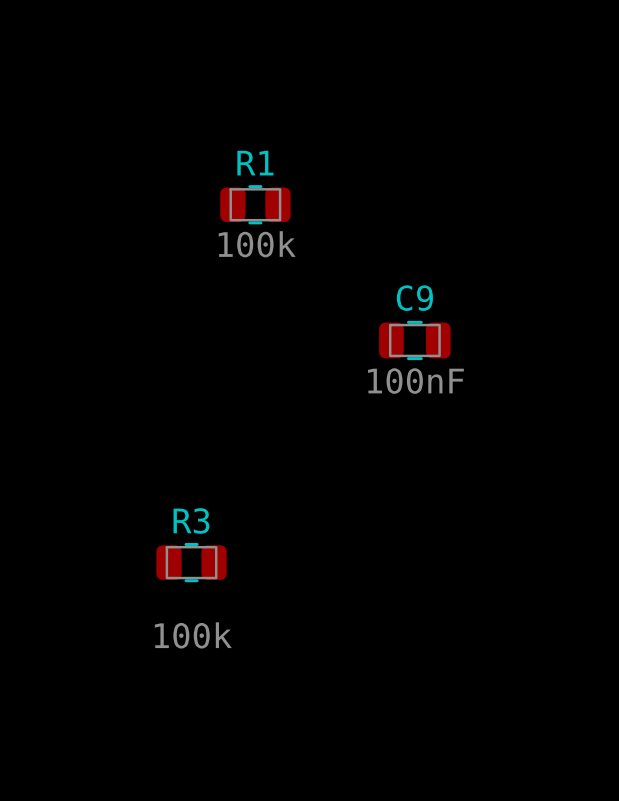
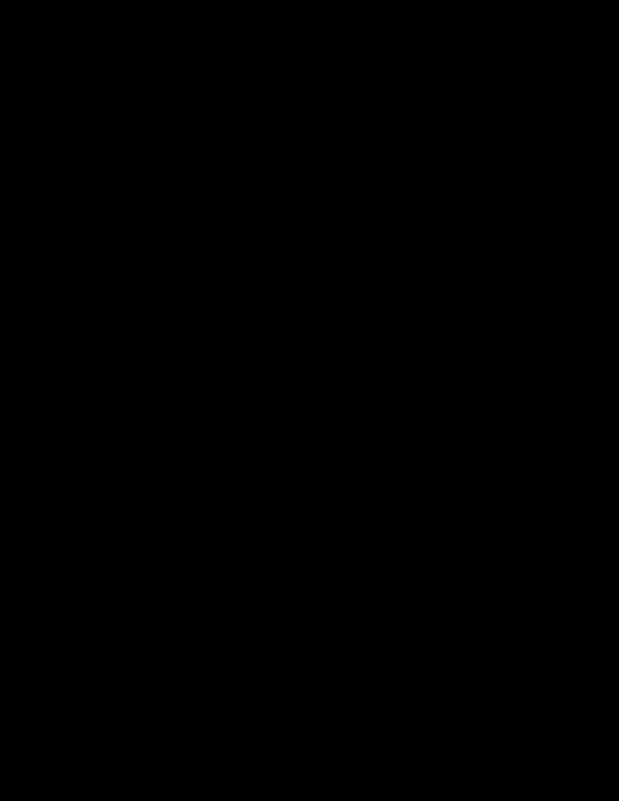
R1: 100k (255, 204) -> none
C9: 100nF (414, 340) -> none
R3: 100k (191, 562) -> none

